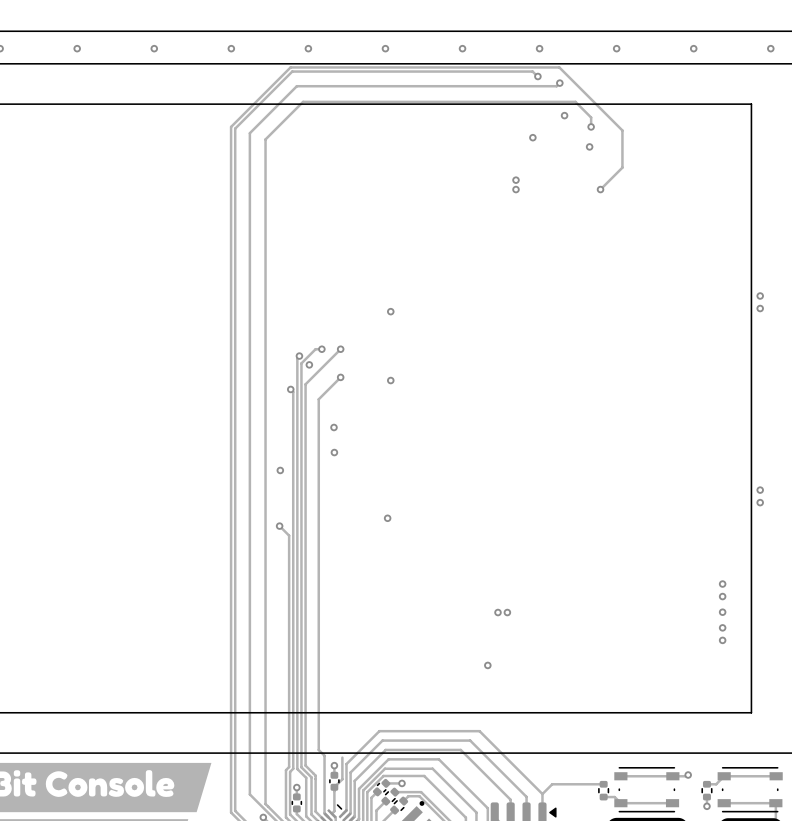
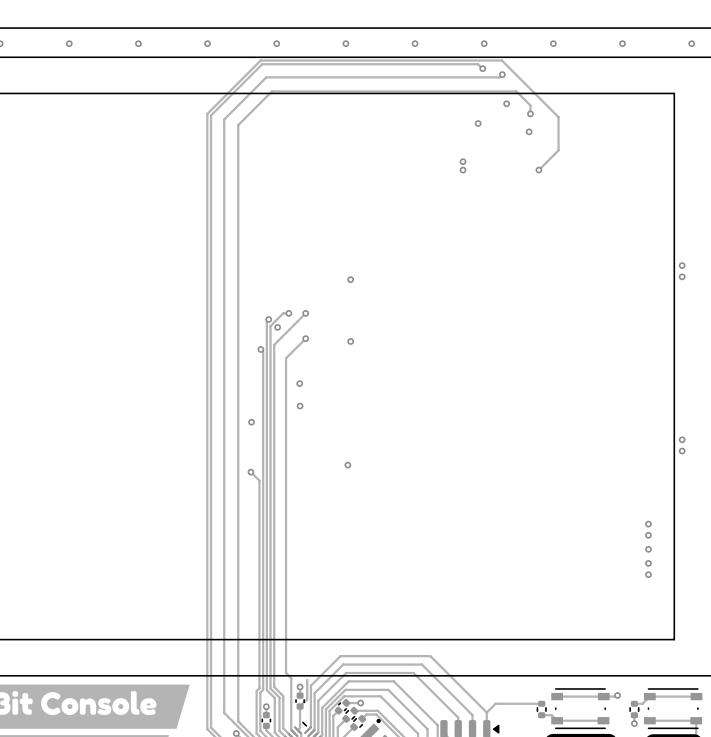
via: (497, 612) -> none
via: (507, 612) -> none
via: (487, 665) -> none

